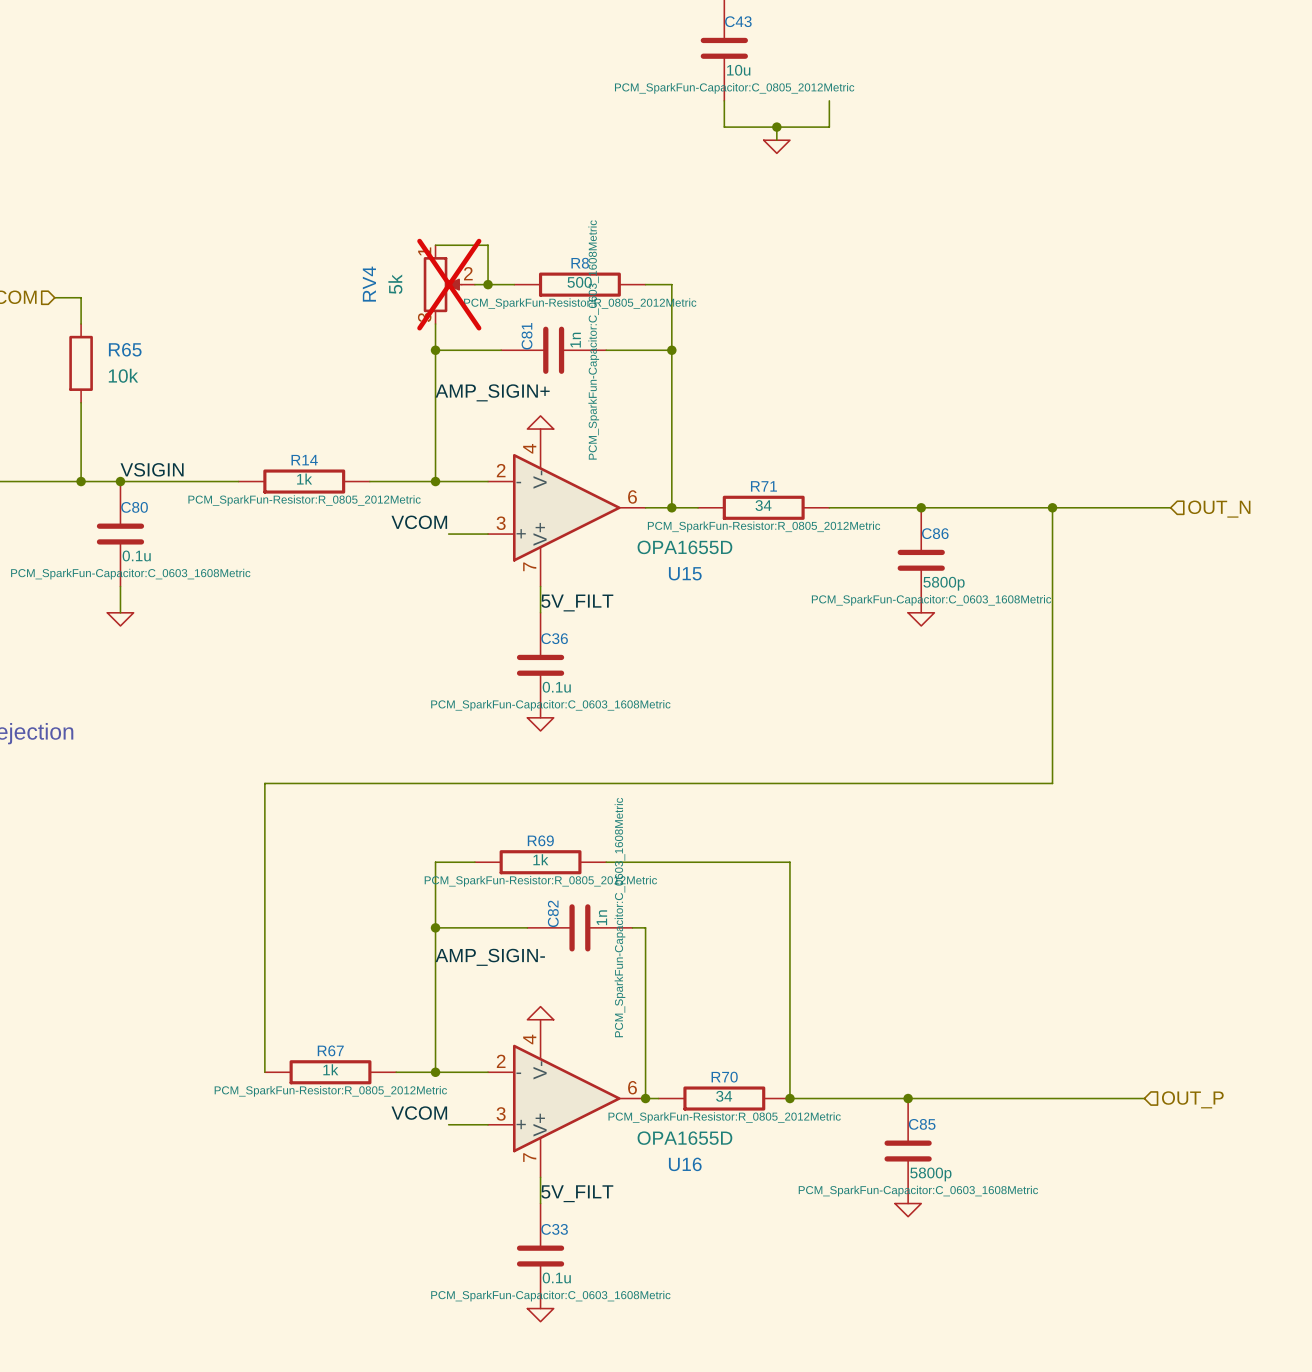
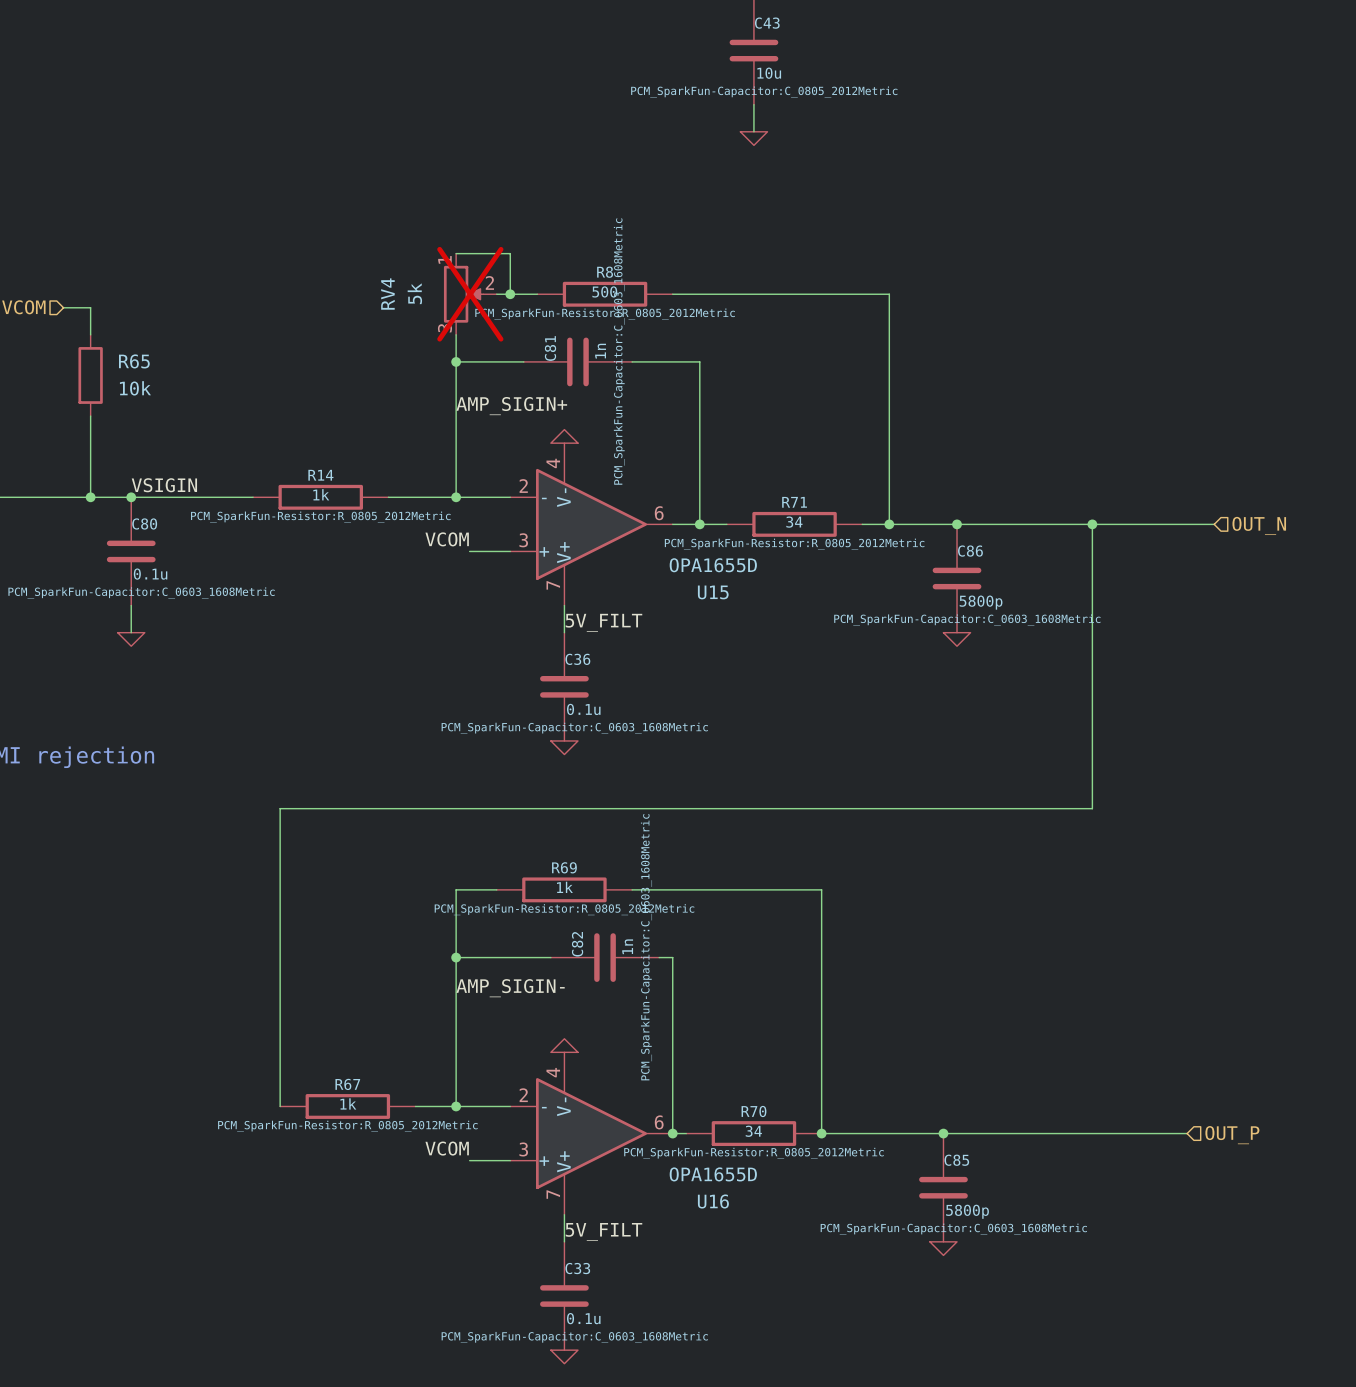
wire: (829, 100) (829, 127) (724, 127) -> none
wire: (776, 127) (776, 140) -> none
junction: (776, 127) -> none
power symbol position: (776, 146) -> (753, 138)
wire: (671, 284) (671, 350) -> (699, 294) (889, 294) (889, 524)
junction: (671, 350) -> none
junction: none -> (889, 524)

